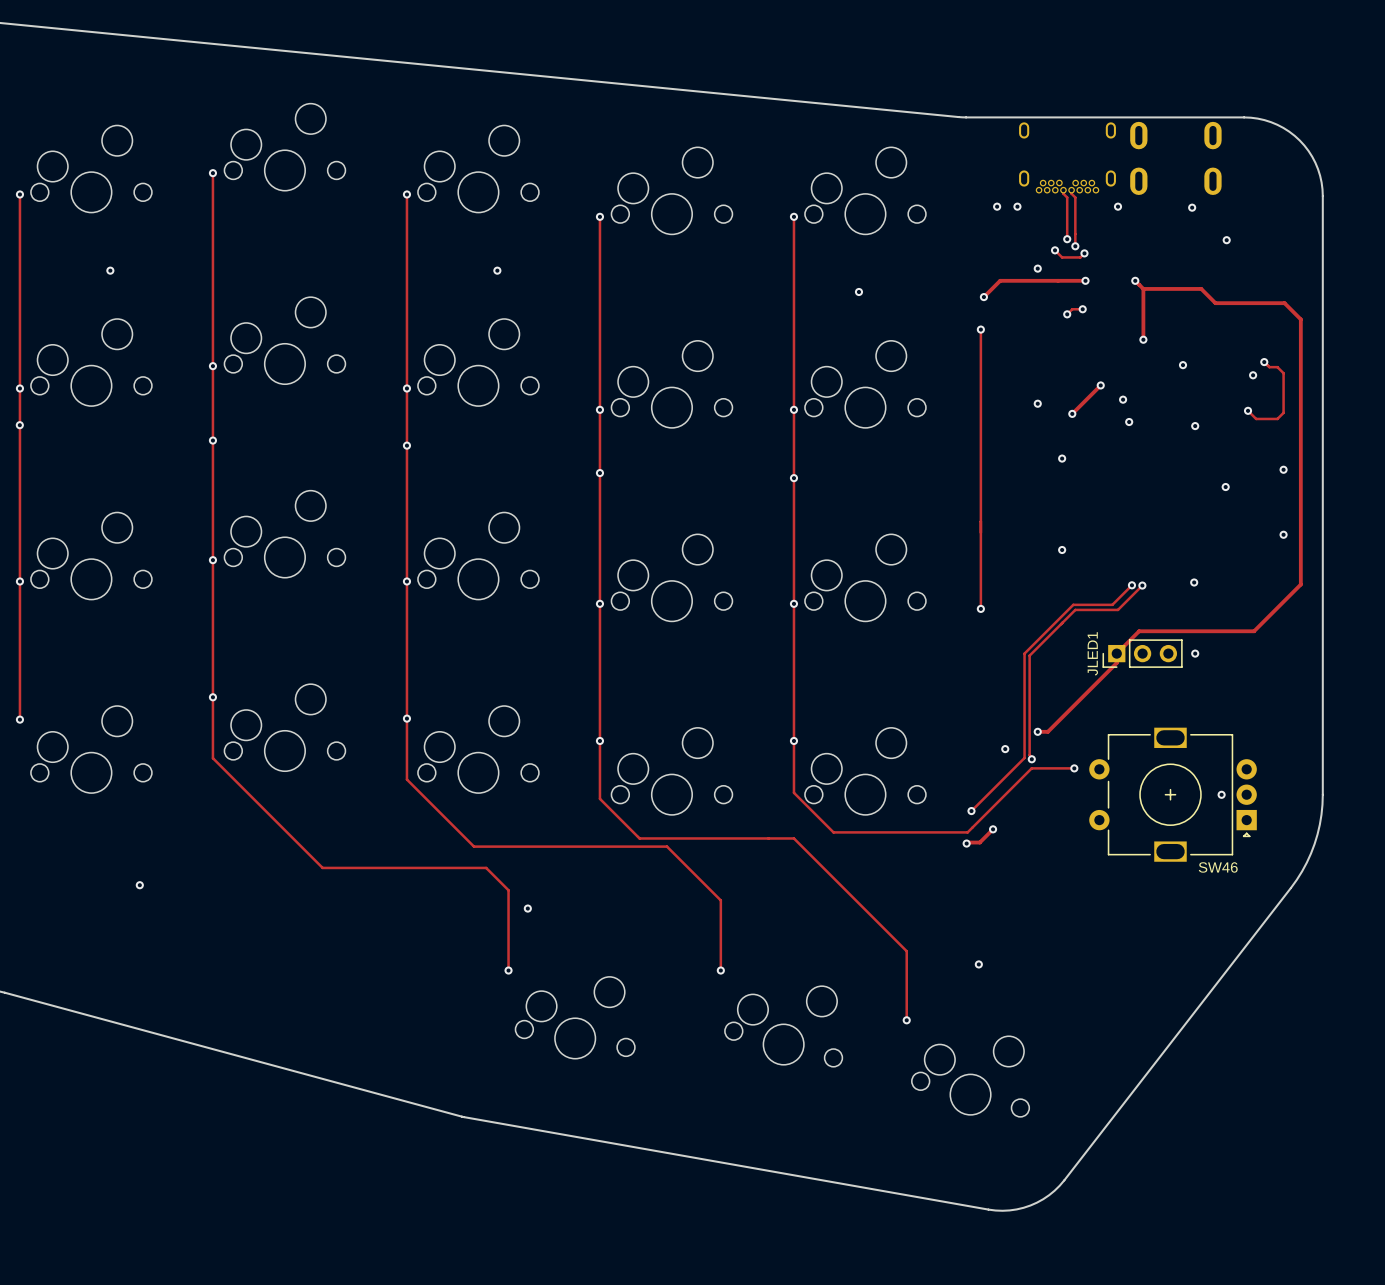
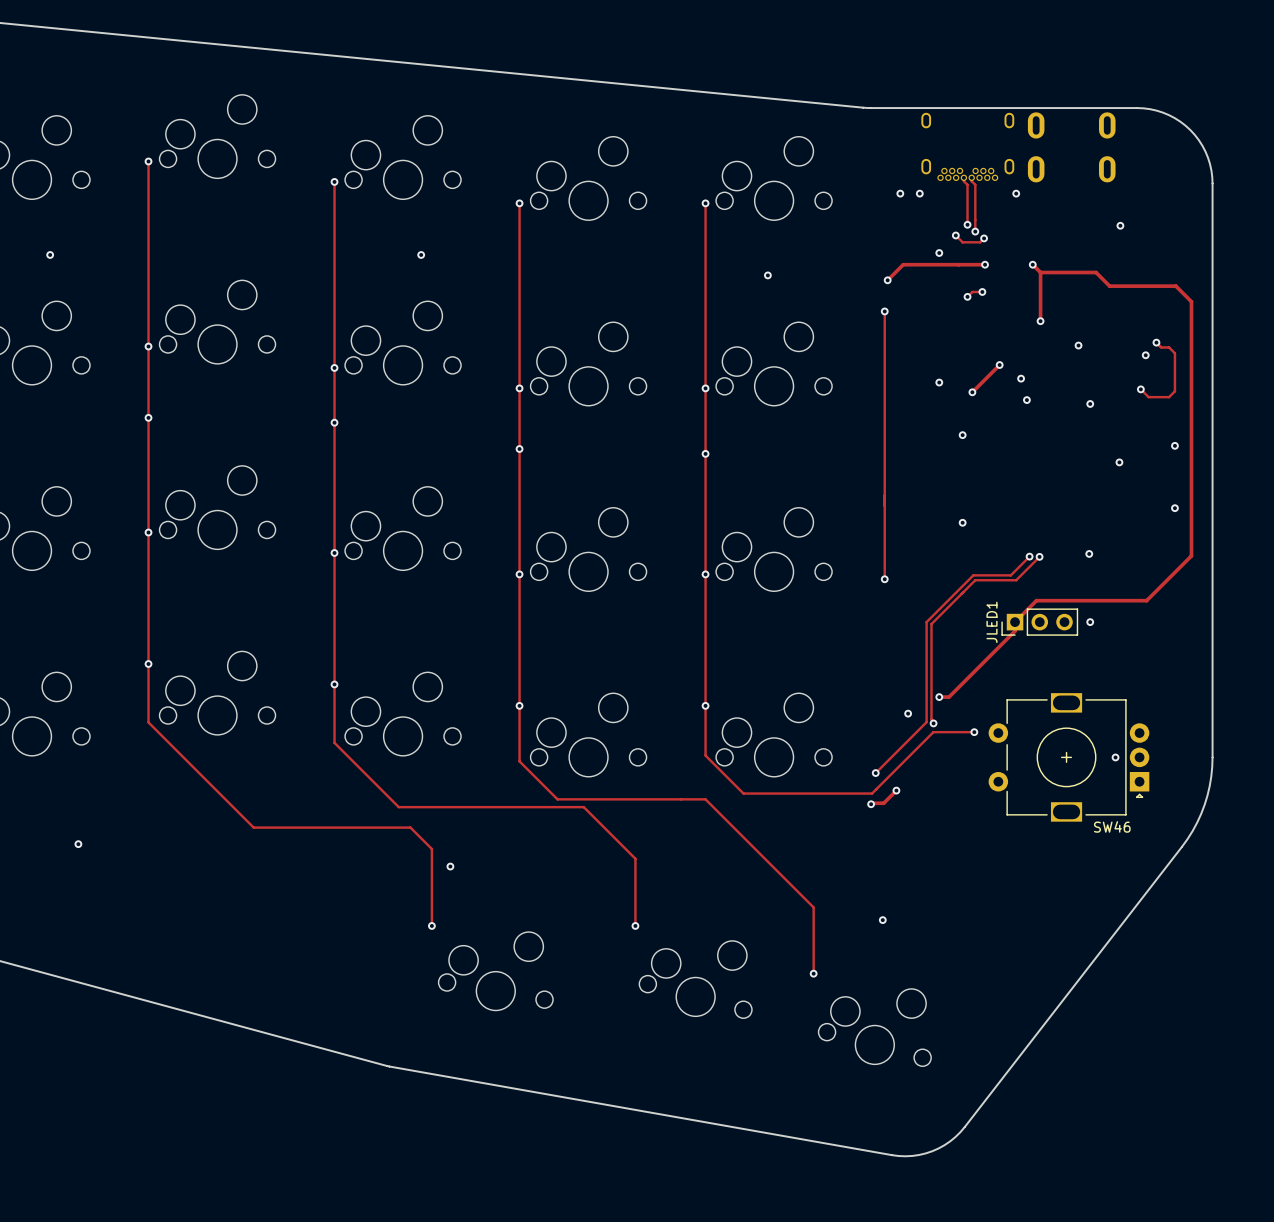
via: (1192, 207) -> none

